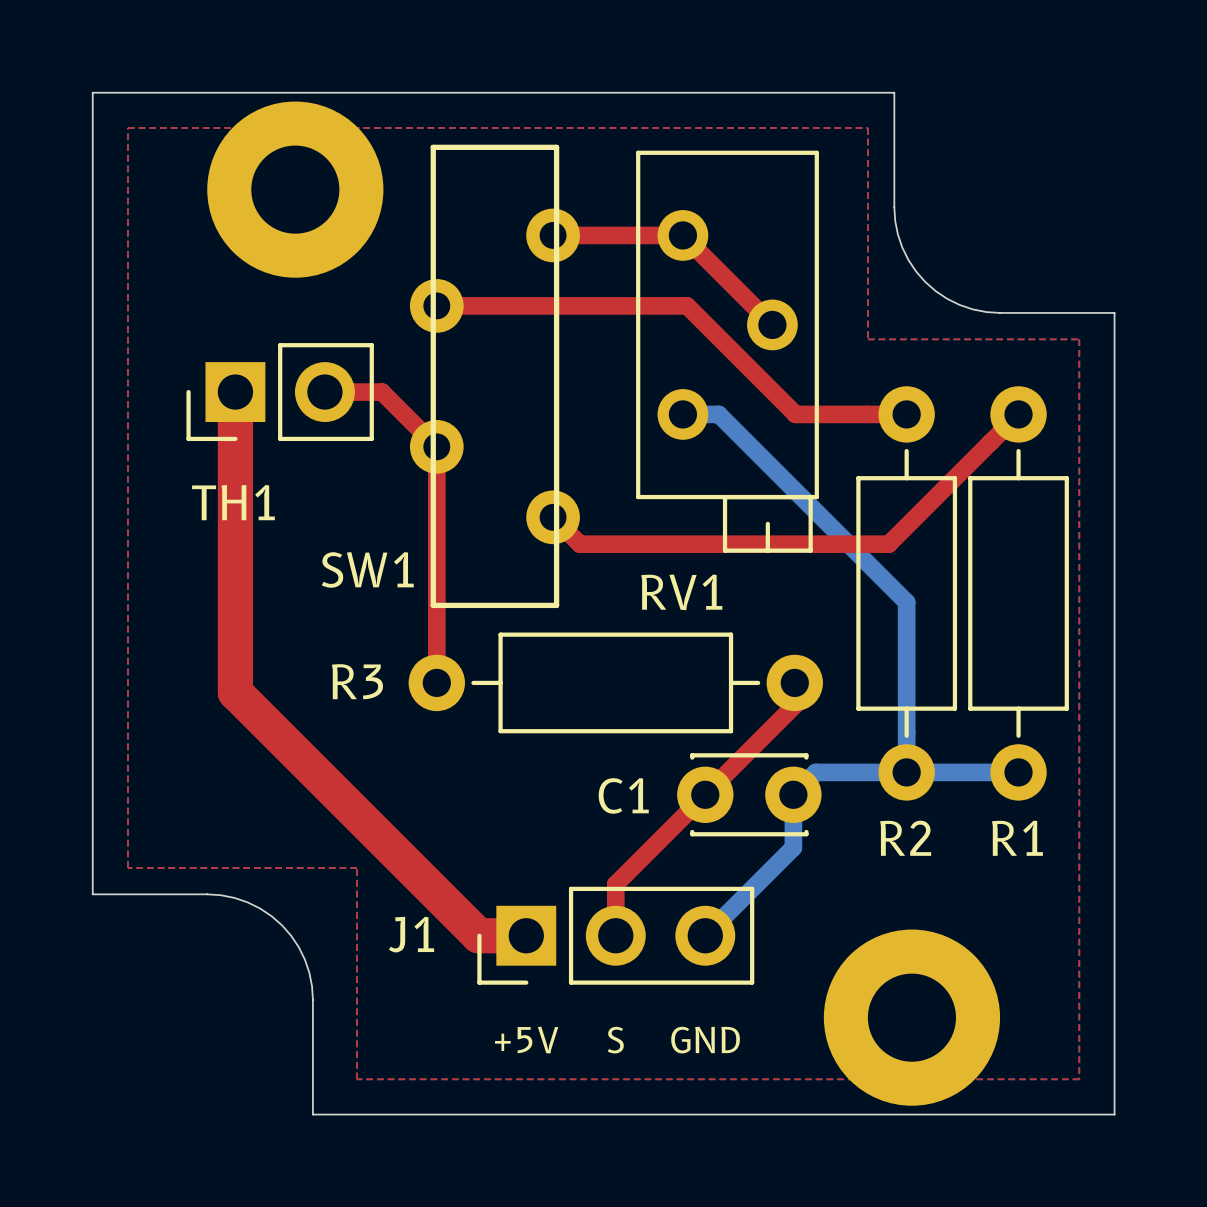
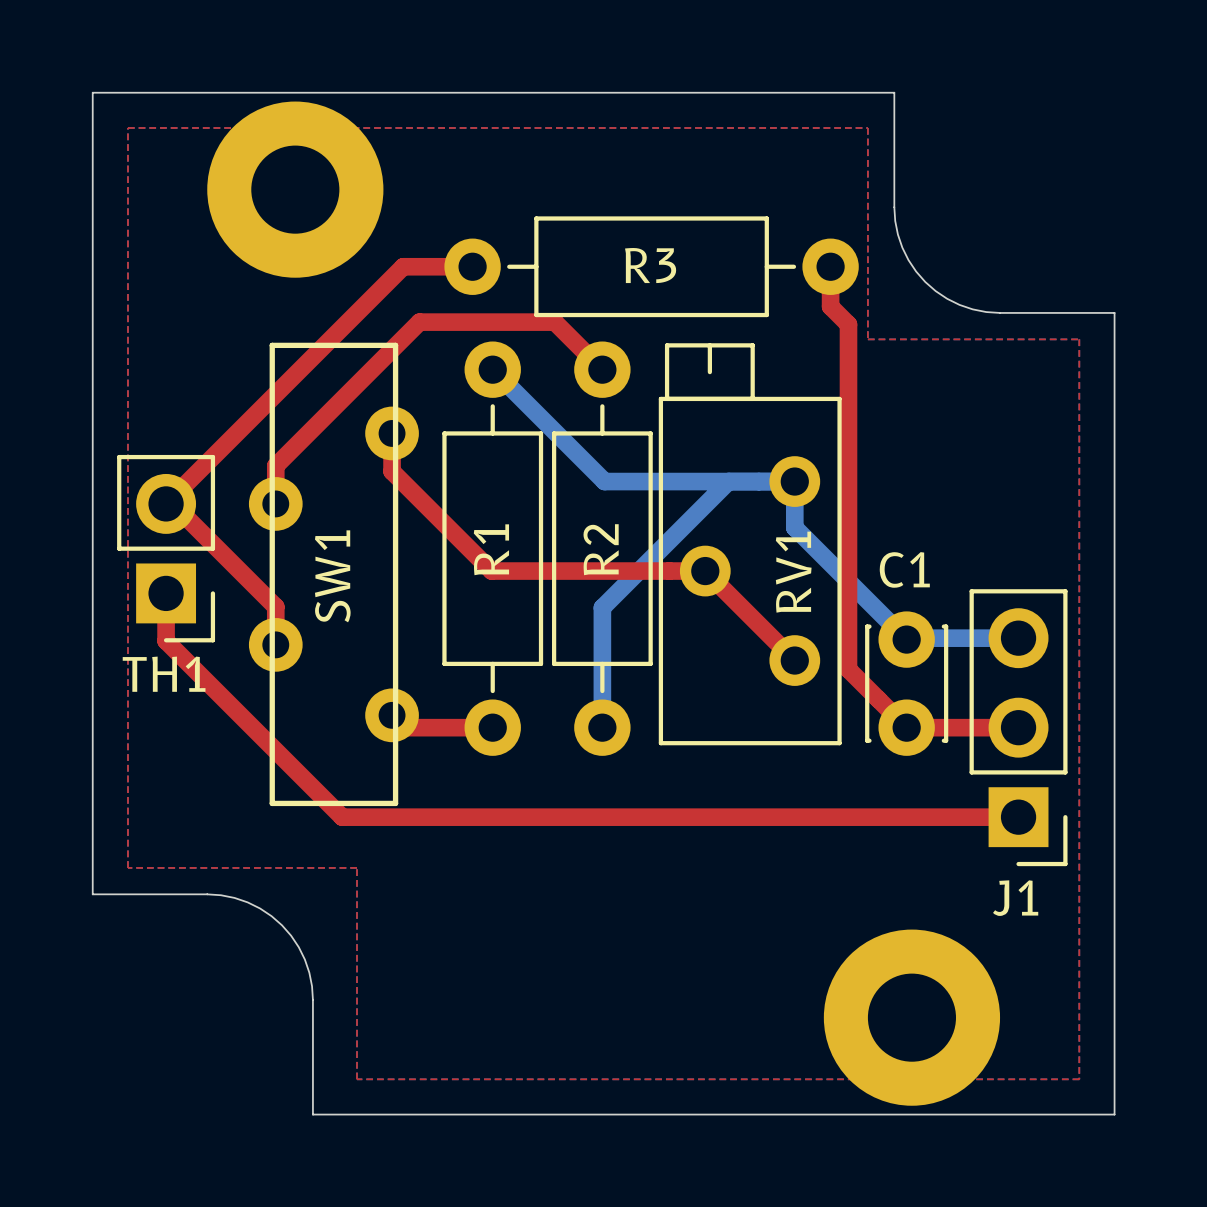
top track: (553, 235) (682, 235) (772, 324) -> none
top track: none -> (472, 266) (403, 266) (166, 503) (172, 503) (275, 606) (275, 644)
top track: none -> (830, 266) (830, 306) (848, 324) (848, 669) (906, 727) (1018, 727)
top track: (436, 305) (687, 305) (795, 414) (906, 414) -> none
RV1 rotation: 0° (727, 351) -> 180° (750, 544)
bottom track: none -> (492, 369) (604, 481) (794, 481) (794, 527) (906, 639) (1018, 638)
top track: none -> (602, 369) (554, 322) (419, 322) (275, 465) (275, 503)
SW1 position: (494, 376) -> (333, 574)
top track: (235, 392) (235, 692) (478, 935) (526, 935) -> none
TH1 rotation: 0° (280, 392) -> 90° counterclockwise (166, 548)
TH1 position: (280, 392) -> (166, 548)
top track: (324, 392) (382, 392) (436, 446) (436, 682) -> none
bottom track: (682, 414) (718, 414) (906, 602) (906, 772) -> none
top track: (1018, 414) (888, 544) (579, 544) (553, 517) -> none
top track: none -> (392, 433) (392, 471) (491, 571) (705, 571) (794, 660)
bottom track: none -> (728, 481) (602, 607) (602, 727)
SW1 name rotation: 0° (367, 569) -> 90° counterclockwise (332, 576)
RV1 name position: RV1 (681, 592) -> RV1 (793, 572)
top track: none -> (166, 593) (166, 640) (342, 817) (1018, 817)
R2 position: (906, 593) -> (602, 548)
R1 position: (1018, 593) -> (492, 548)
R3 name position: R3 (357, 681) -> R3 (650, 265)
R3 position: (615, 682) -> (651, 266)
top track: (794, 682) (794, 705) (615, 884) (615, 935) -> none
top track: none -> (392, 715) (404, 727) (492, 727)
bottom track: (1018, 772) (815, 772) (793, 794) (793, 847) (705, 935) -> none
C1 rotation: 0° (749, 794) -> 90° clockwise (906, 683)
C1 position: (749, 794) -> (906, 683)
R2 name rotation: 0° (905, 838) -> 90° counterclockwise (601, 549)
R2 name position: R2 (905, 838) -> R2 (601, 549)
R1 name rotation: 0° (1017, 838) -> 90° counterclockwise (491, 549)
R1 name position: R1 (1017, 838) -> R1 (491, 549)
J1 rotation: 0° (615, 935) -> 90° counterclockwise (1018, 727)
J1 position: (615, 935) -> (1018, 727)
text: +5V (526, 1040) -> none
text: S (615, 1040) -> none
text: GND (705, 1040) -> none

